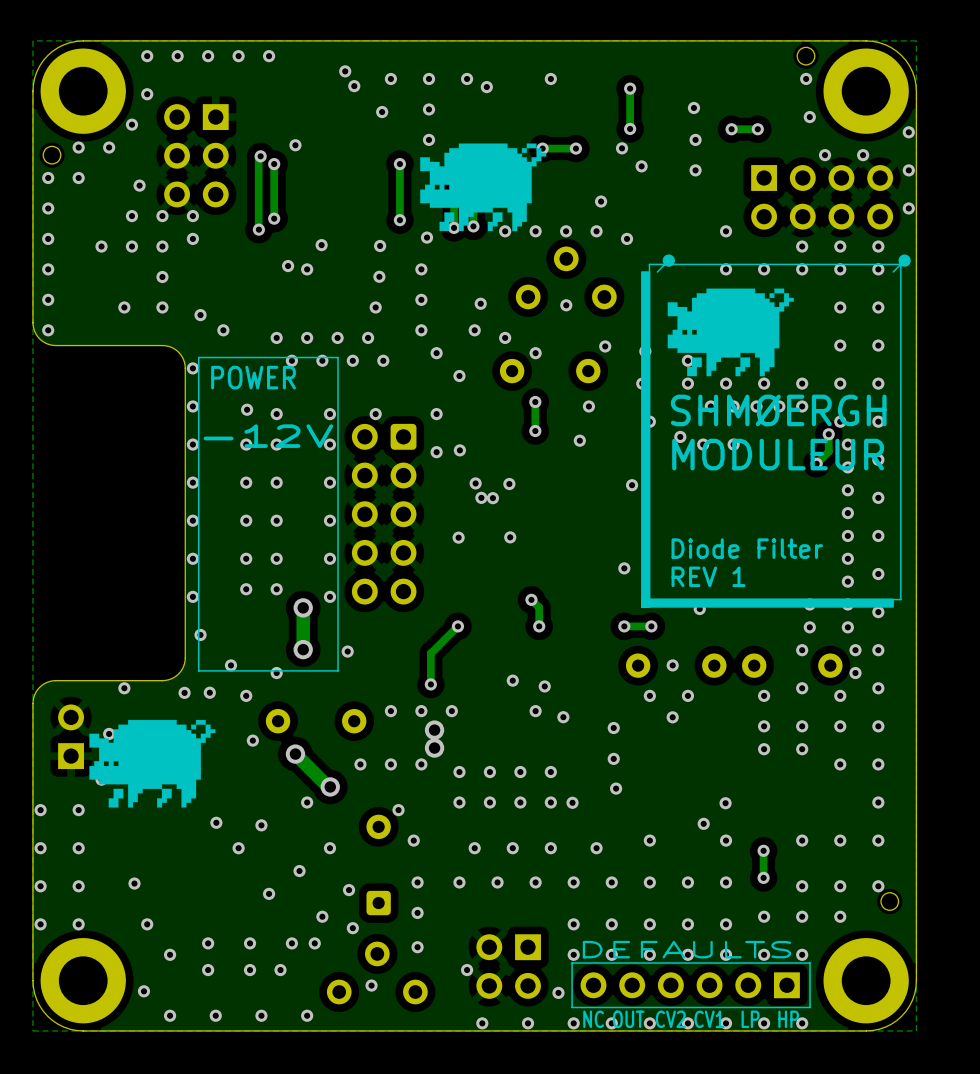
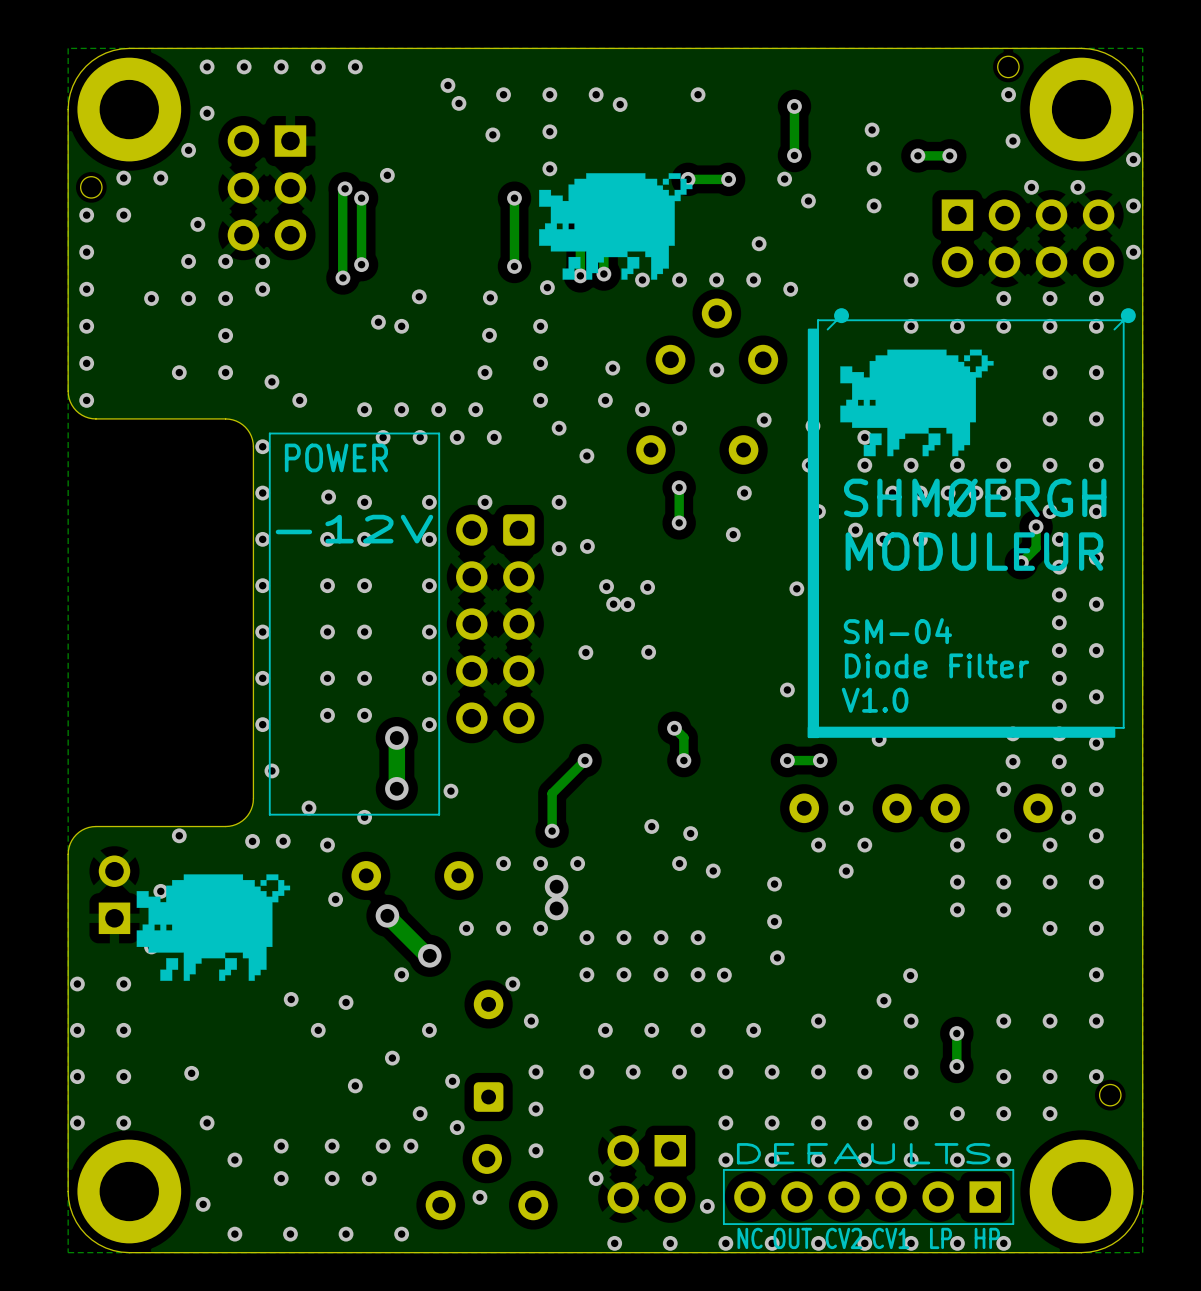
text: none -> SM-04 (897, 631)
text: REV 1 (708, 576) -> V1.0 (875, 700)

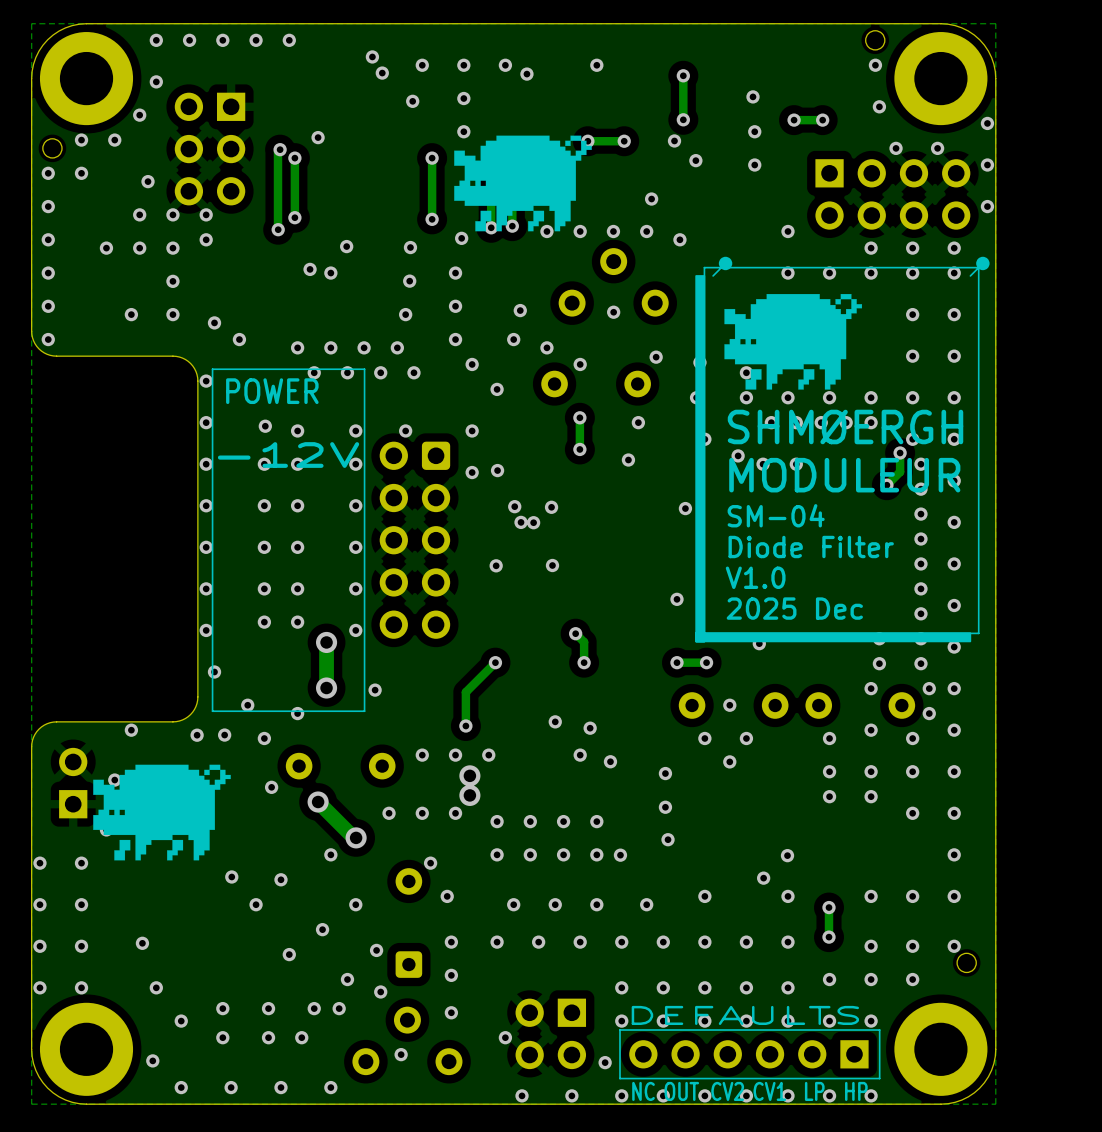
text: none -> SM-04 (776, 515)
text: SM-04 (897, 631) -> Diode Filter (811, 547)
text: Diode Filter (936, 665) -> V1.0 (755, 577)
text: V1.0 (875, 700) -> 2025 Dec (794, 608)

